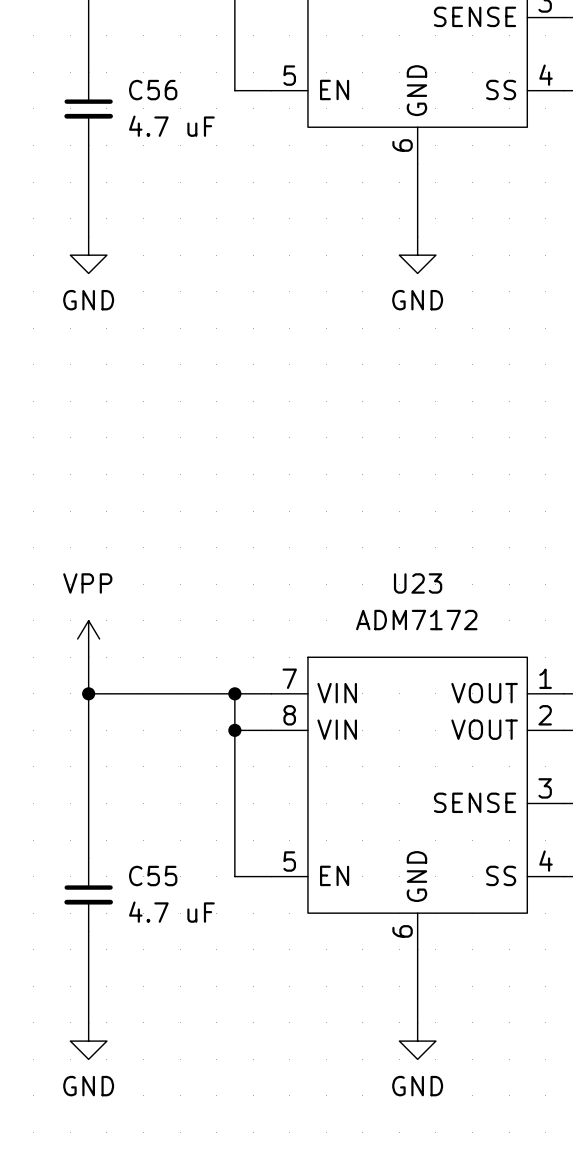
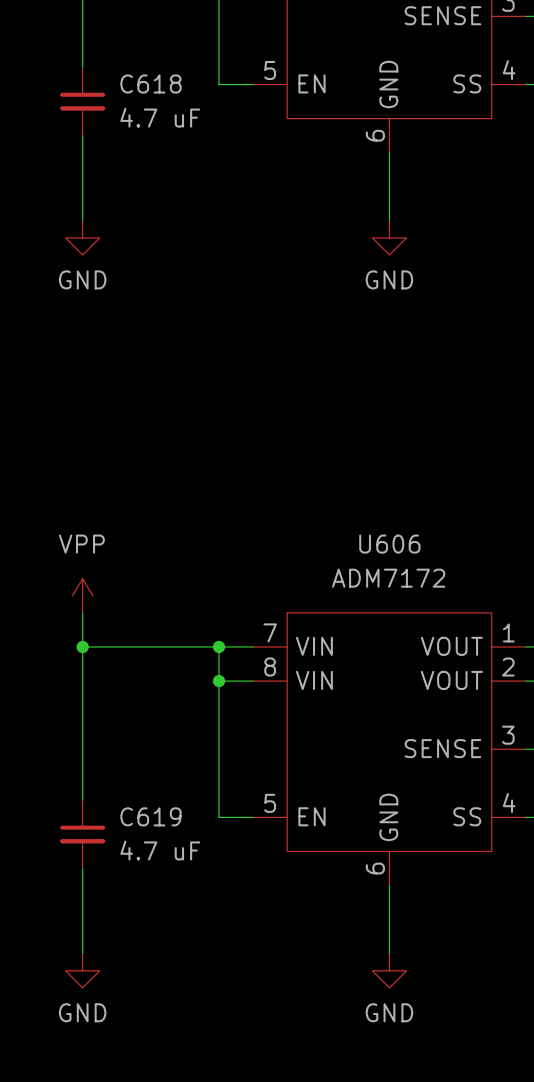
C56 name: C56 (153, 90) -> C618 (150, 83)
U23 name: U23 (418, 583) -> U606 (389, 544)
C55 name: C55 (153, 876) -> C619 (150, 816)

